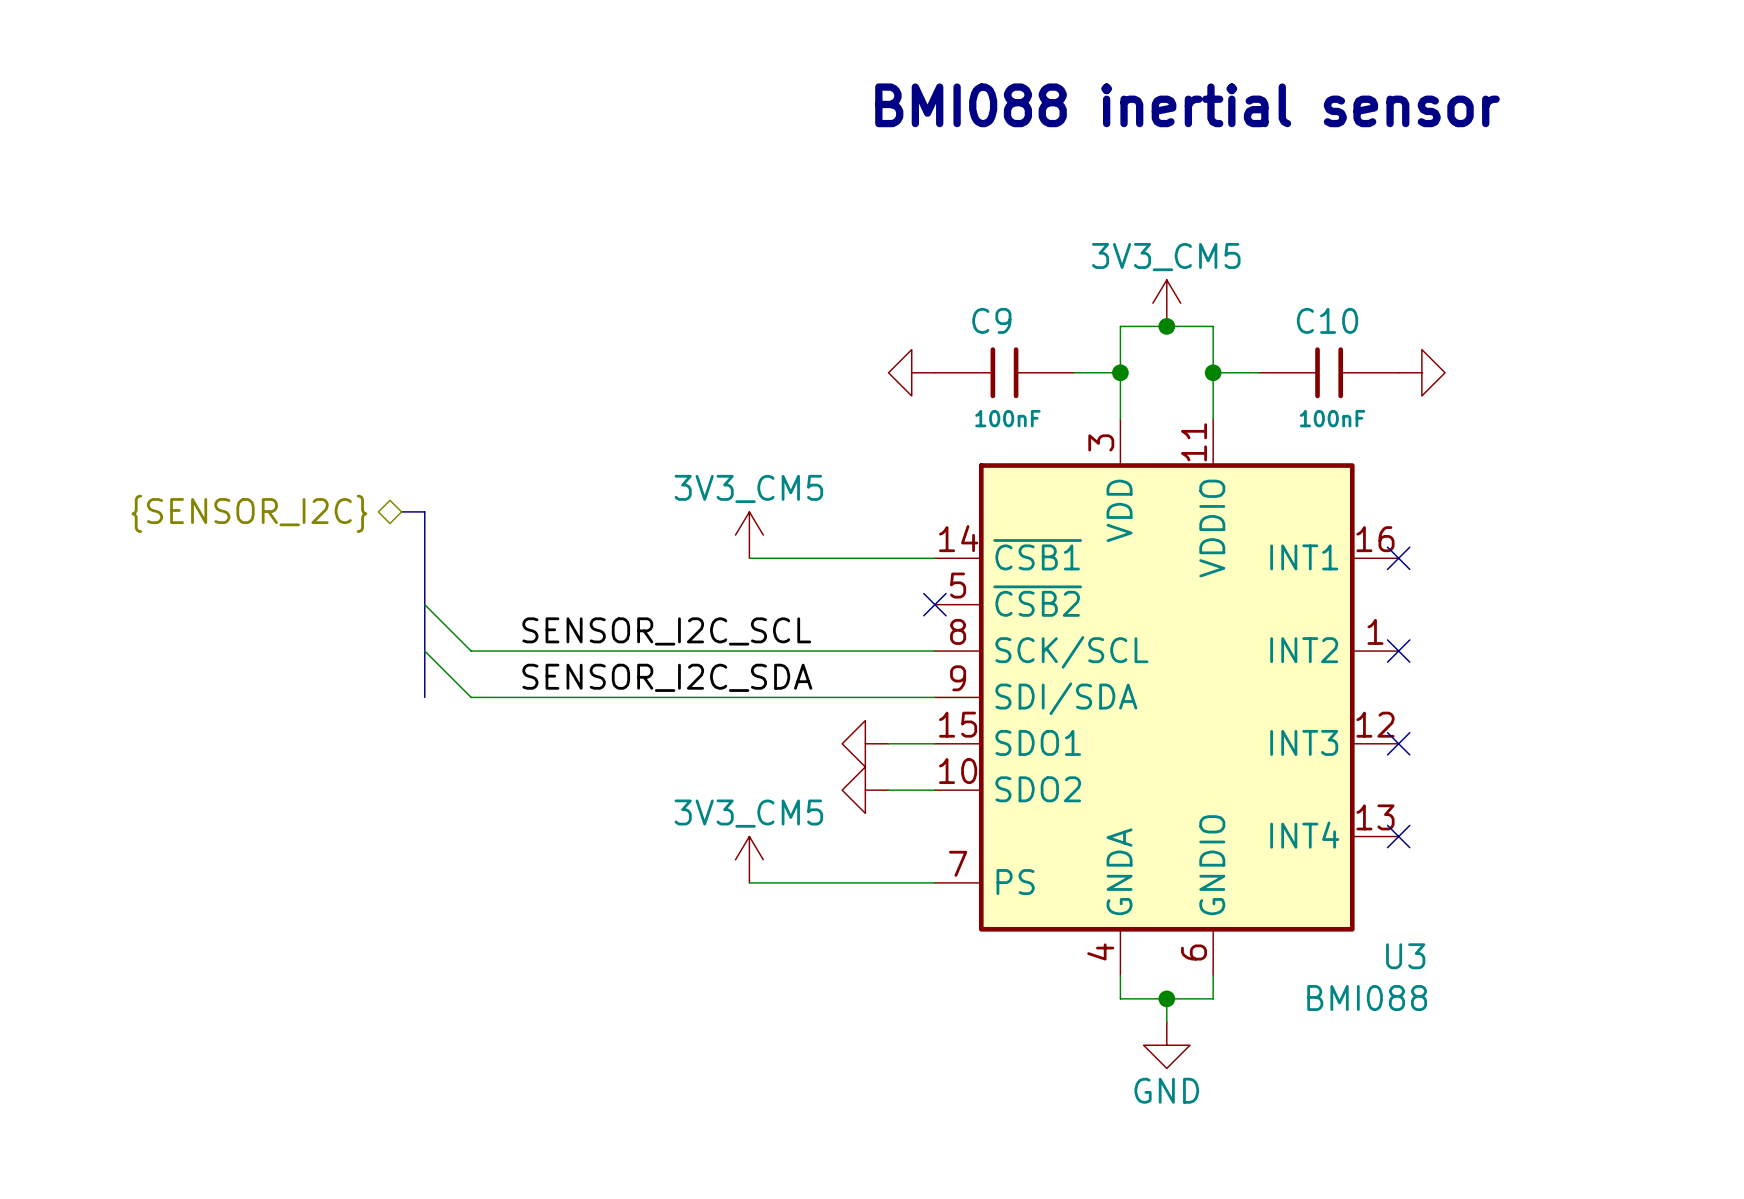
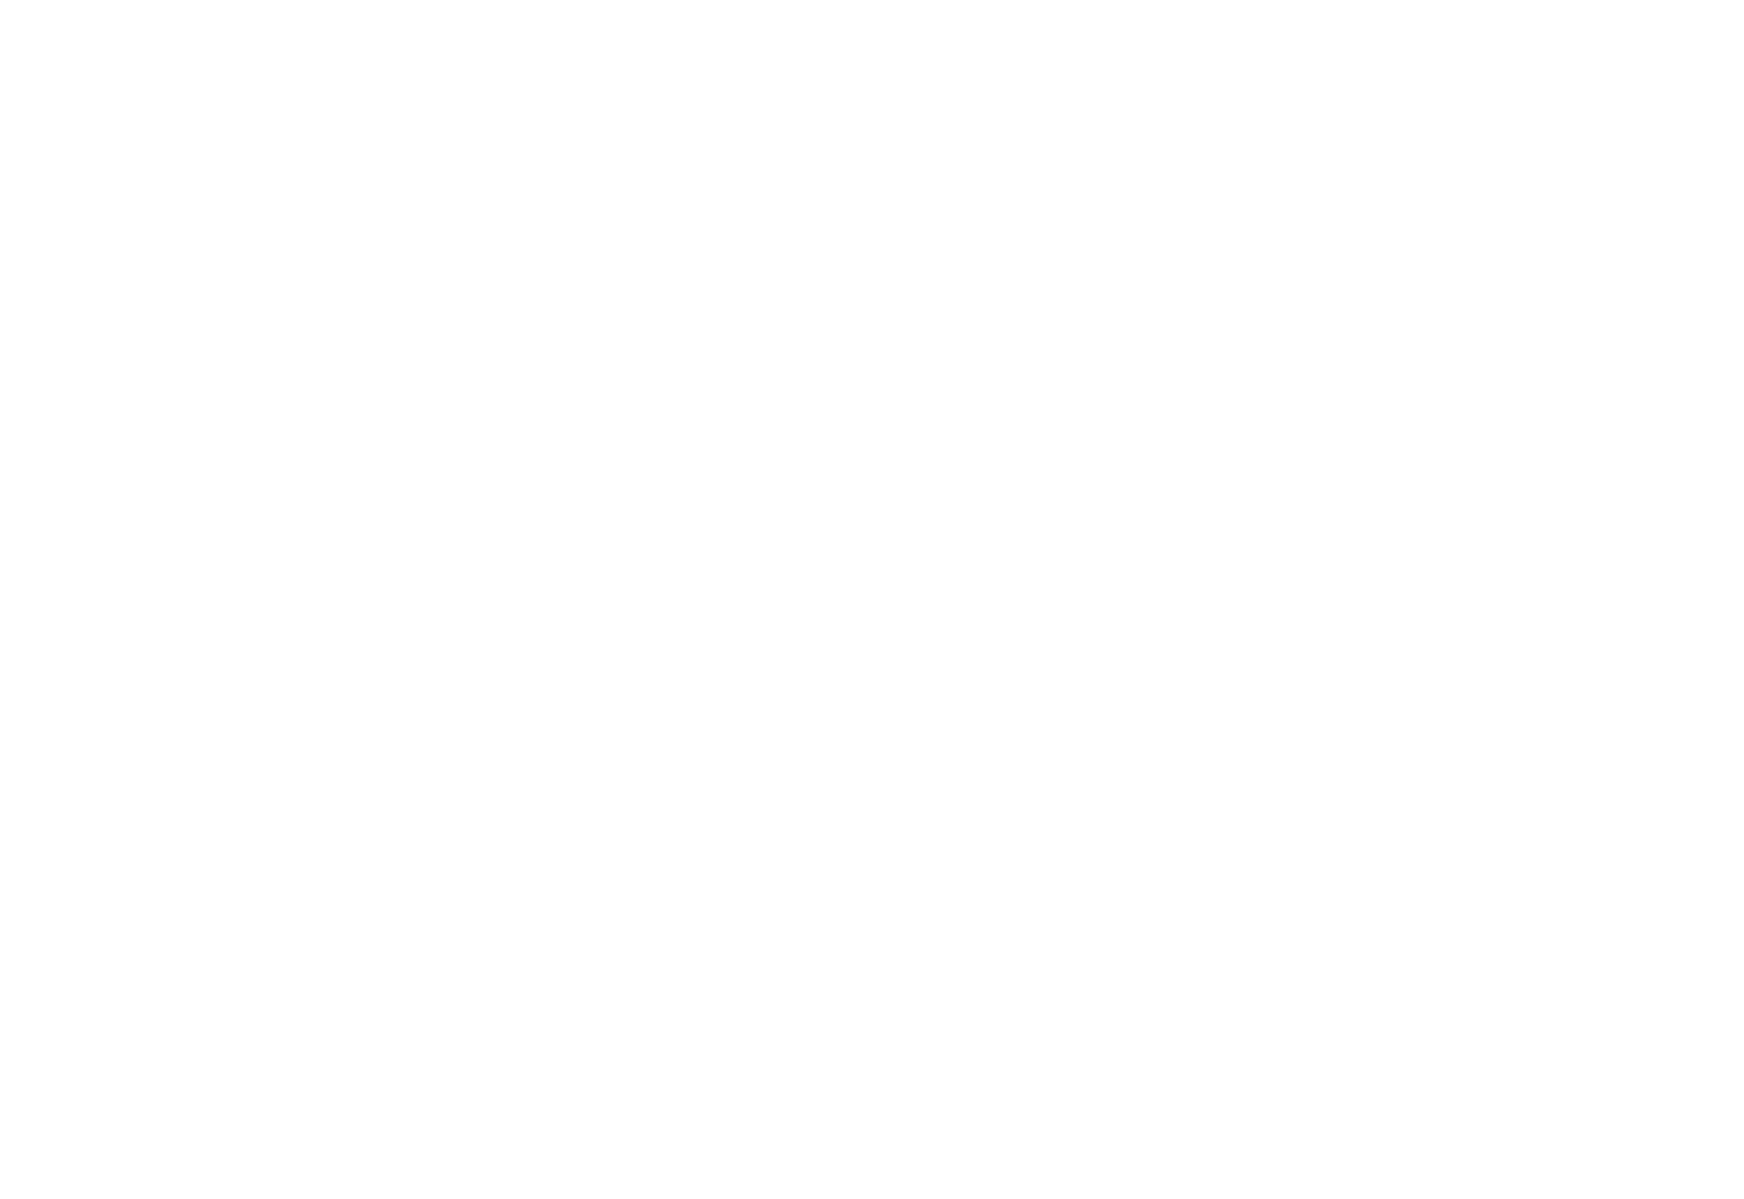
text: BMI088 inertial sensor (1187, 105) -> none
power symbol: 3V3_CM5 (1166, 303) -> none
junction: (1166, 326) -> none
power symbol: (911, 372) -> none
C9: 100nF (1004, 372) -> none
wire: (1074, 372) (1120, 372) -> none
junction: (1120, 372) -> none
wire: (1213, 372) (1259, 372) -> none
junction: (1213, 372) -> none
C10: 100nF (1329, 372) -> none
power symbol: (1421, 372) -> none
wire: (1120, 419) (1120, 326) (1213, 326) (1213, 419) -> none
bus: (401, 511) (424, 511) (424, 697) -> none
hierarchical label: {SENSOR_I2C} (249, 513) -> none
power symbol: 3V3_CM5 (749, 535) -> none
wire: (749, 558) (934, 558) -> none
no-connect mark: (1398, 558) -> none
wire: (424, 604) (471, 651) (934, 651) -> none
no-connect mark: (934, 604) -> none
label: SENSOR_I2C_SCL (666, 631) -> none
wire: (424, 651) (471, 697) (934, 697) -> none
no-connect mark: (1398, 651) -> none
label: SENSOR_I2C_SDA (667, 677) -> none
U3: BMI088 (1166, 697) -> none
power symbol: (865, 743) -> none
wire: (888, 743) (934, 743) -> none
no-connect mark: (1398, 743) -> none
power symbol: (865, 790) -> none
wire: (888, 790) (934, 790) -> none
no-connect mark: (1398, 836) -> none
power symbol: 3V3_CM5 (749, 859) -> none
wire: (749, 882) (934, 882) -> none
wire: (1120, 975) (1120, 998) (1213, 998) (1213, 975) -> none
wire: (1166, 998) (1166, 1022) -> none
junction: (1166, 998) -> none
power symbol: GND (1166, 1045) -> none

